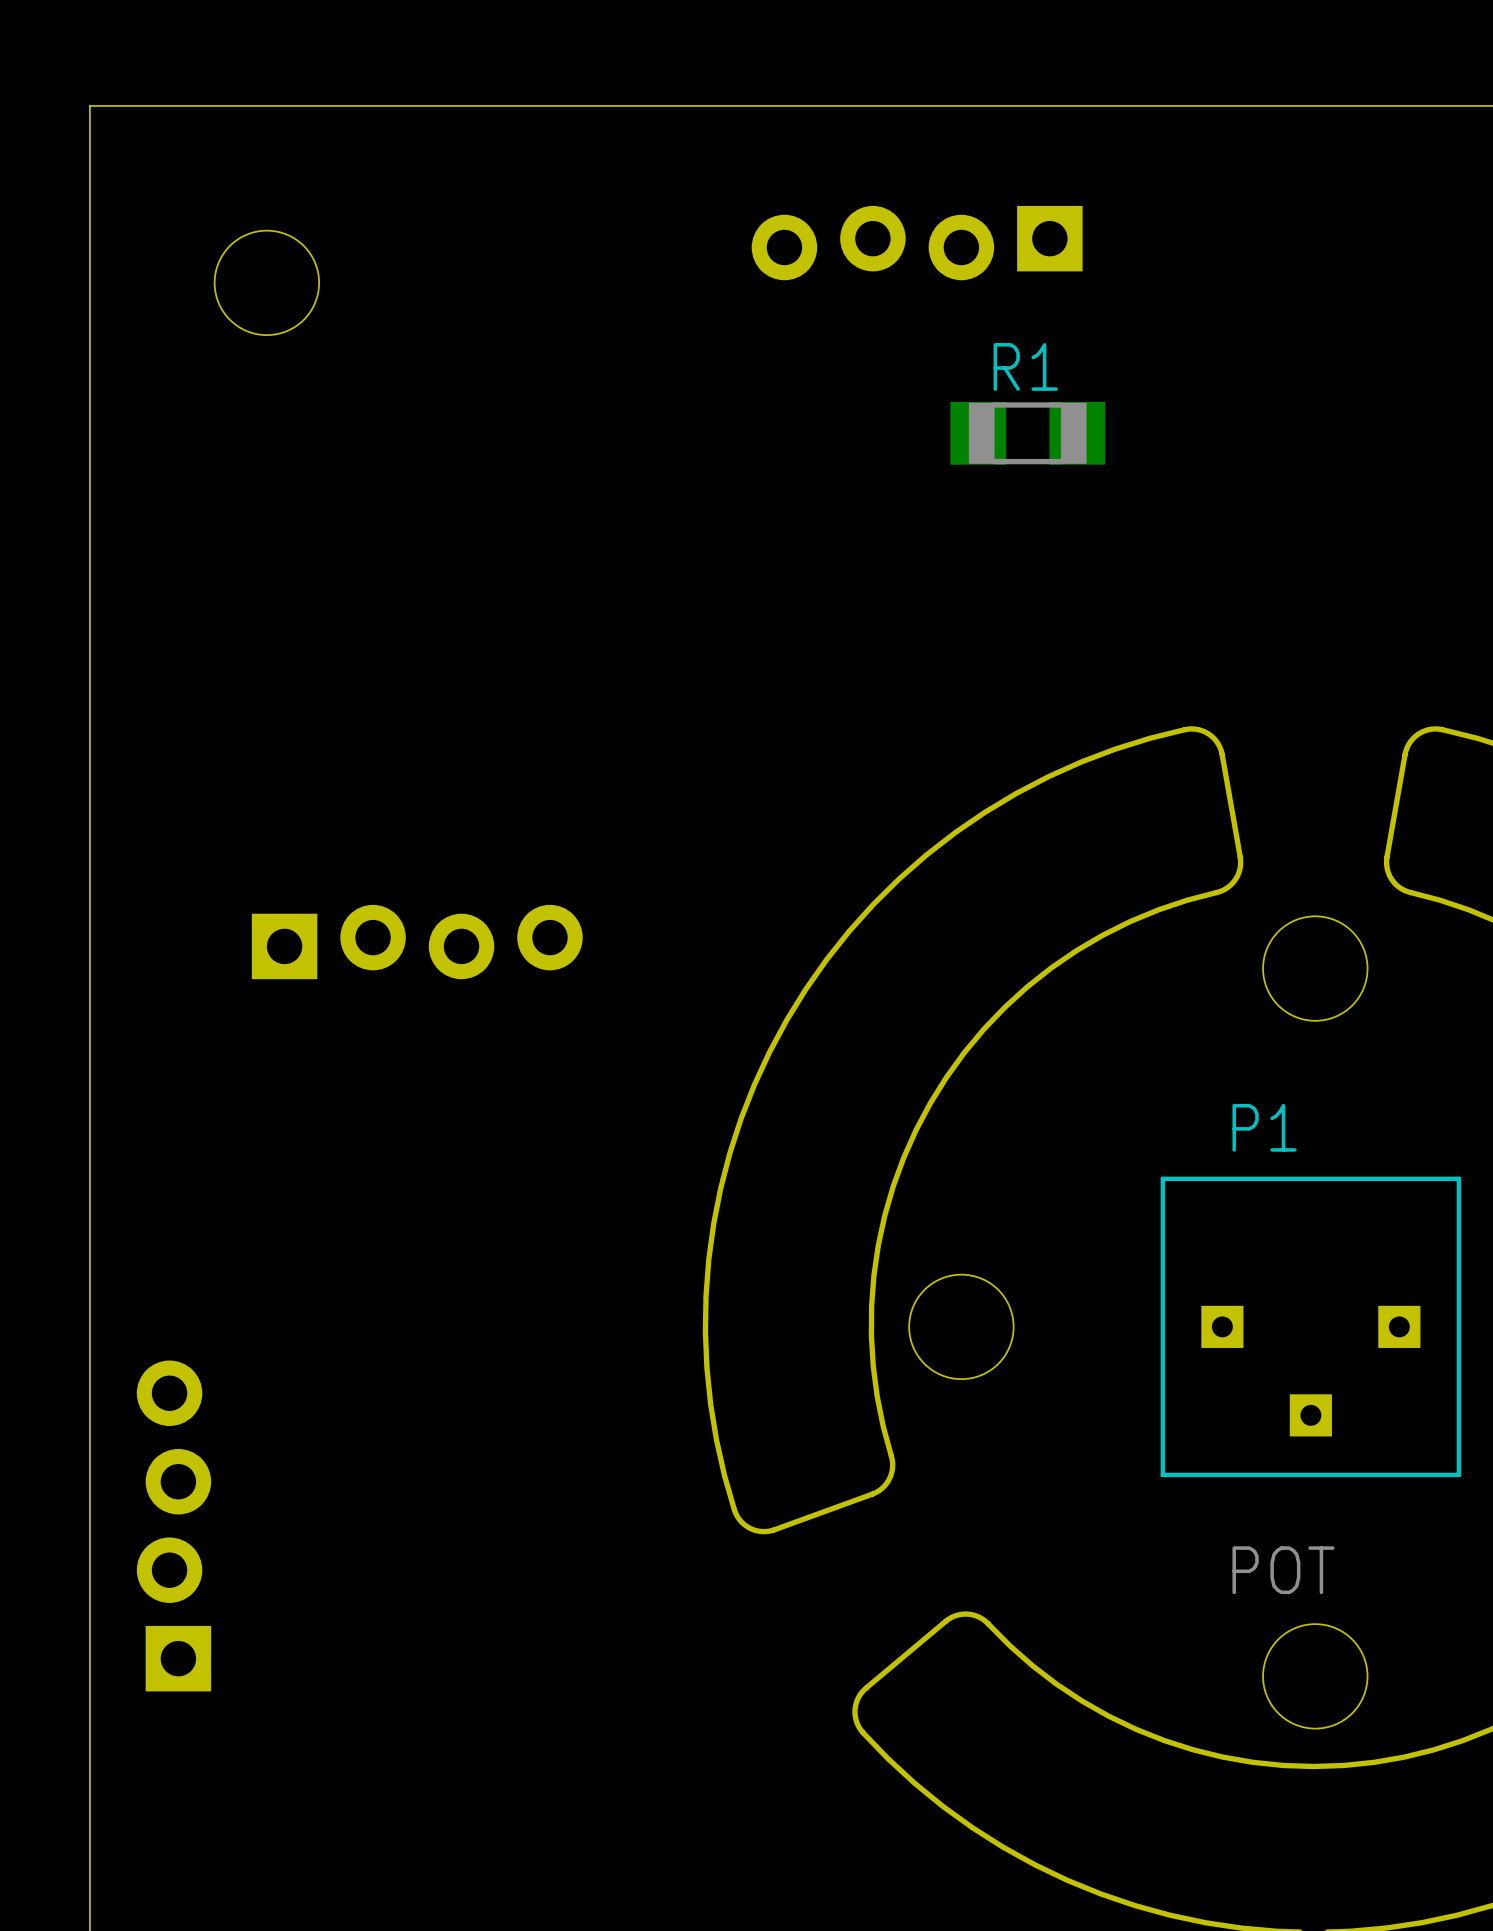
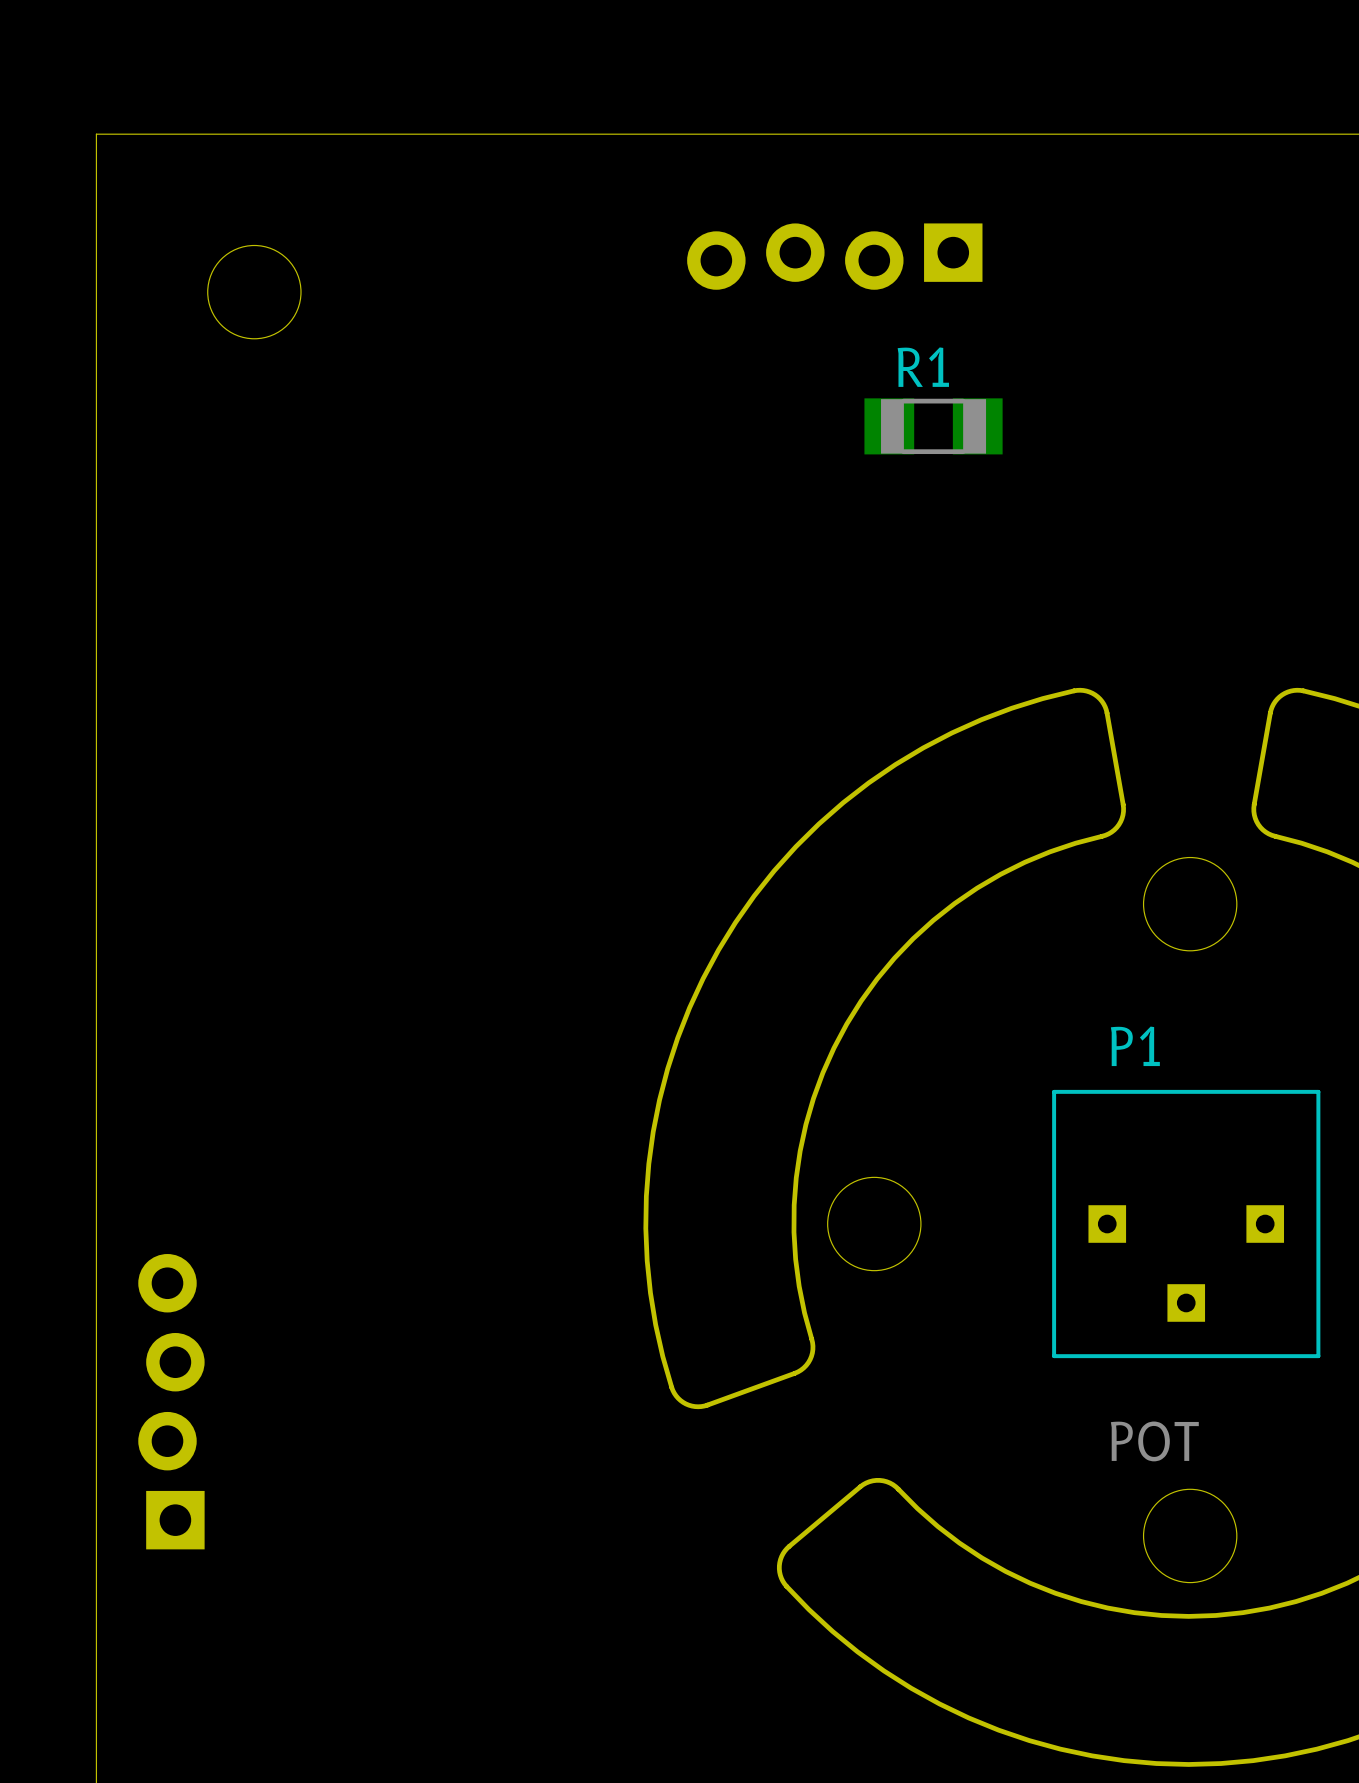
part: (417, 942) -> none

